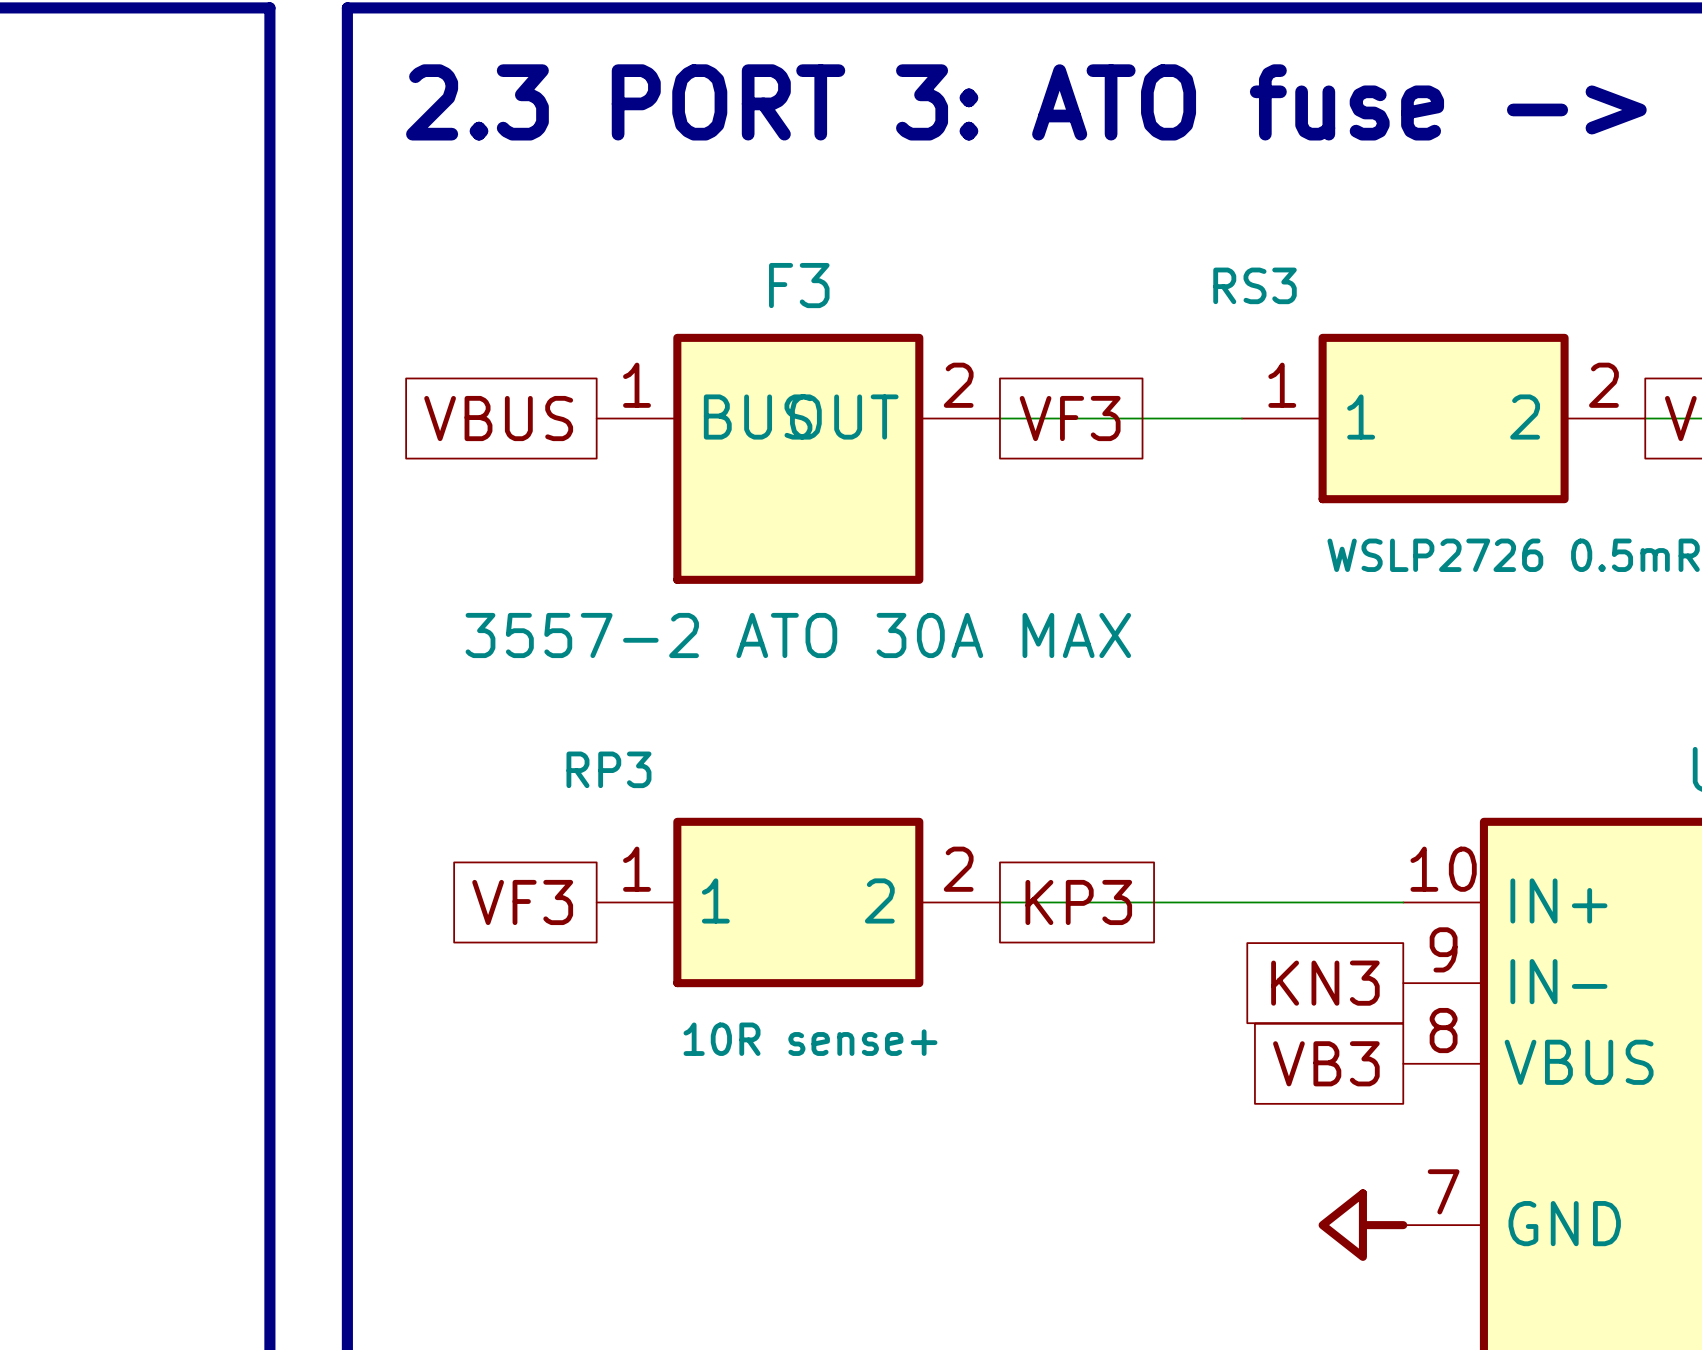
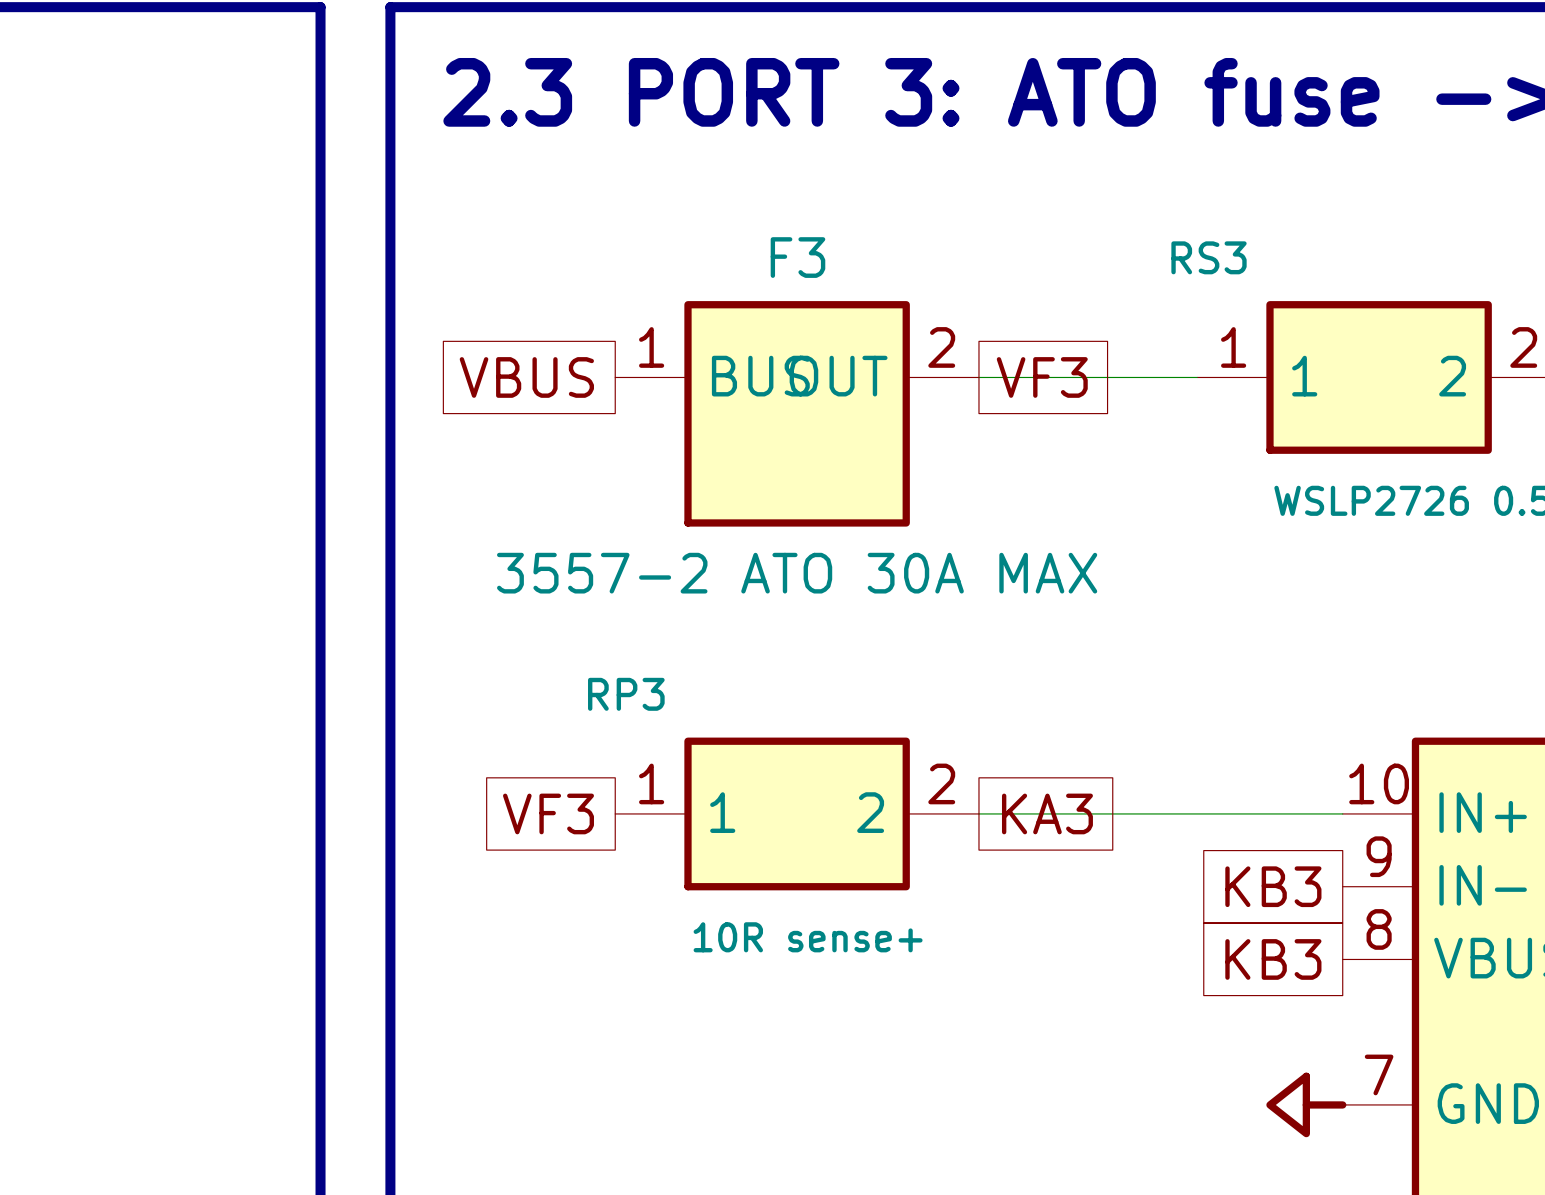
global label: KP3 (1078, 902) -> KA3 (1047, 813)
global label: KN3 (1325, 983) -> KB3 (1273, 886)
global label: VB3 (1326, 1063) -> KB3 (1273, 959)

